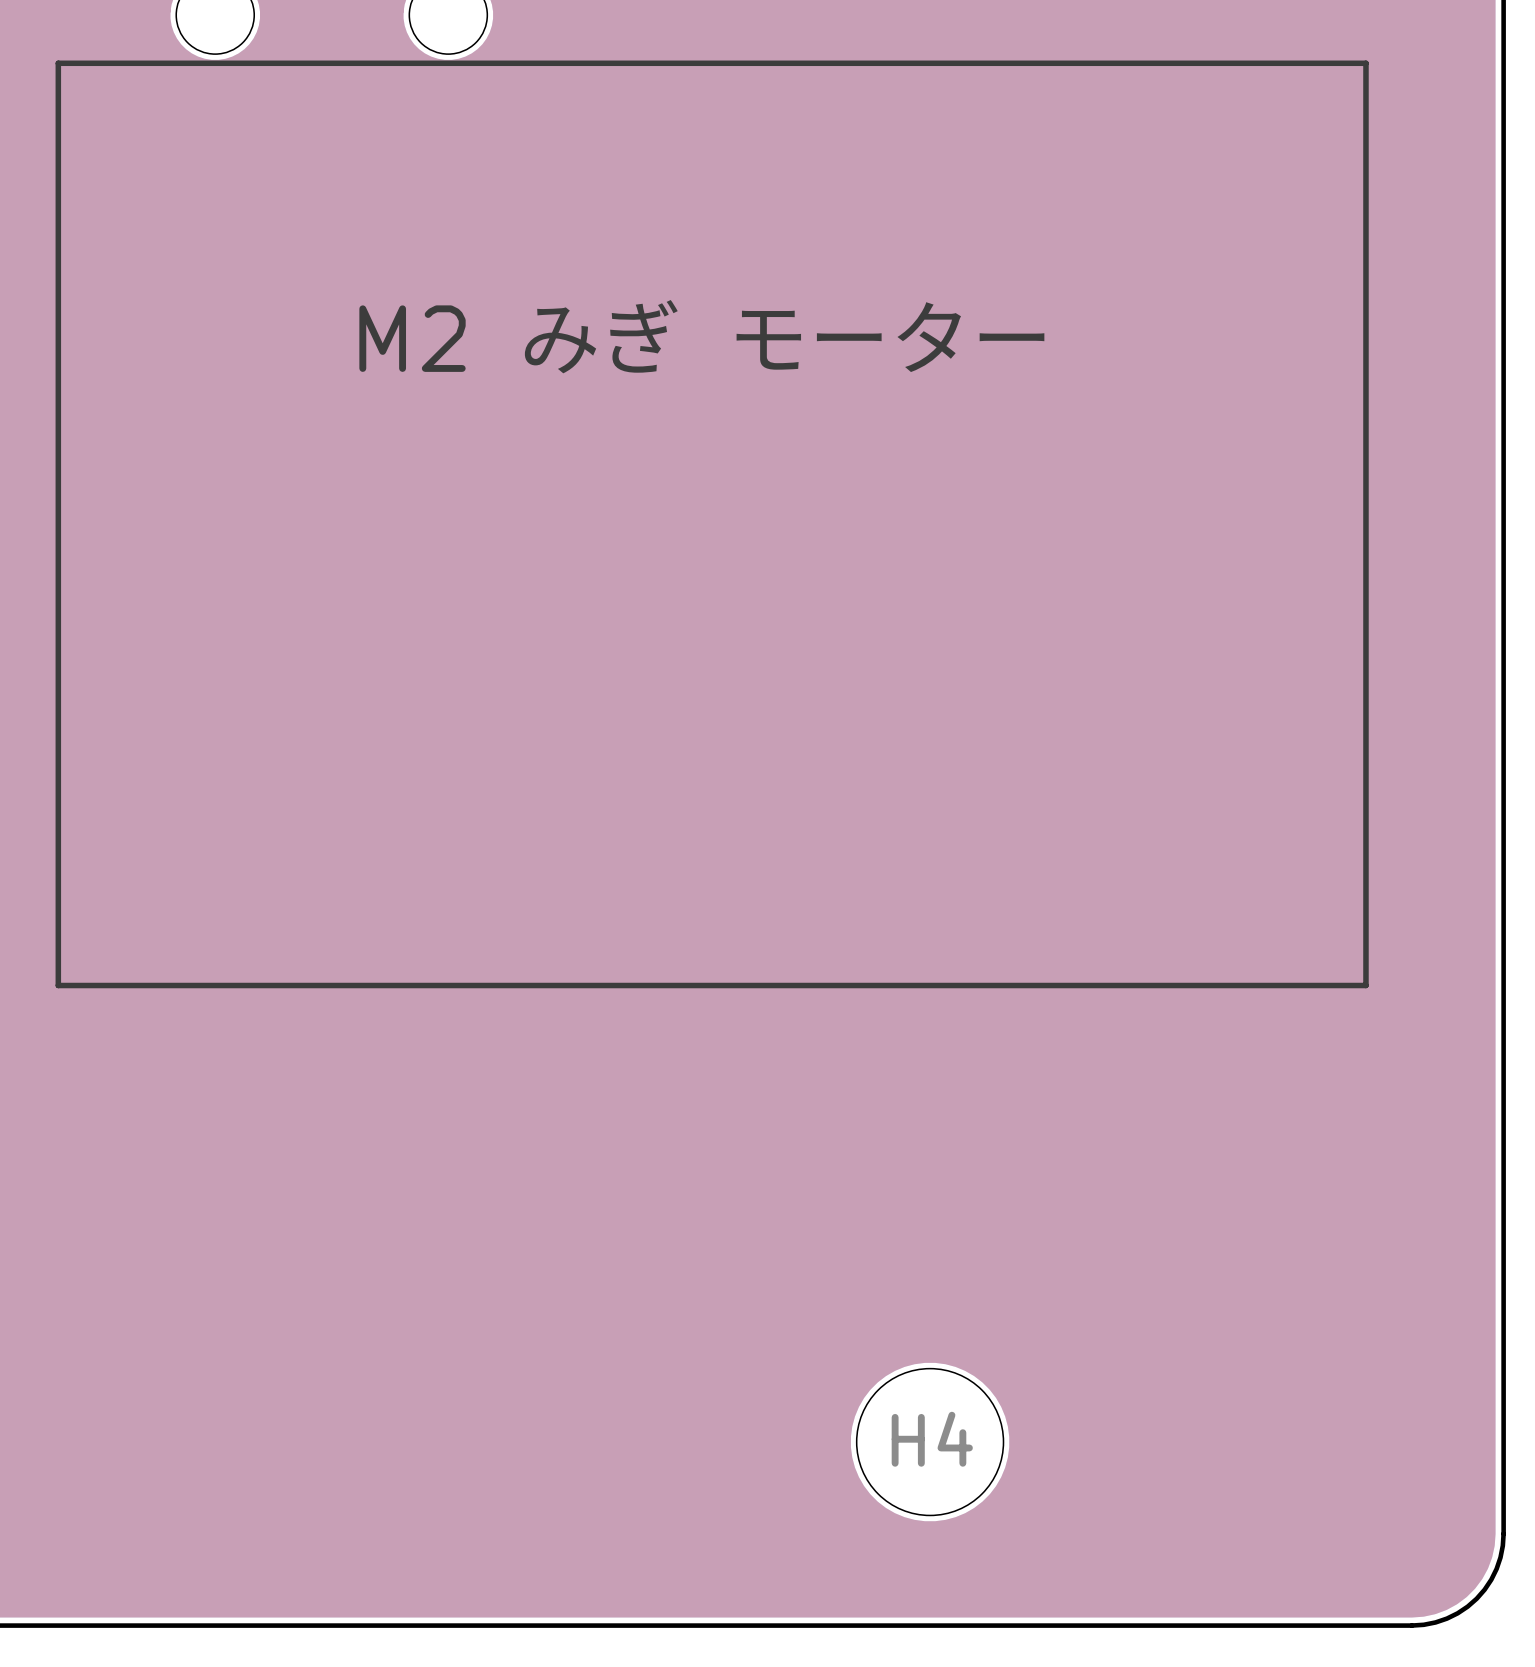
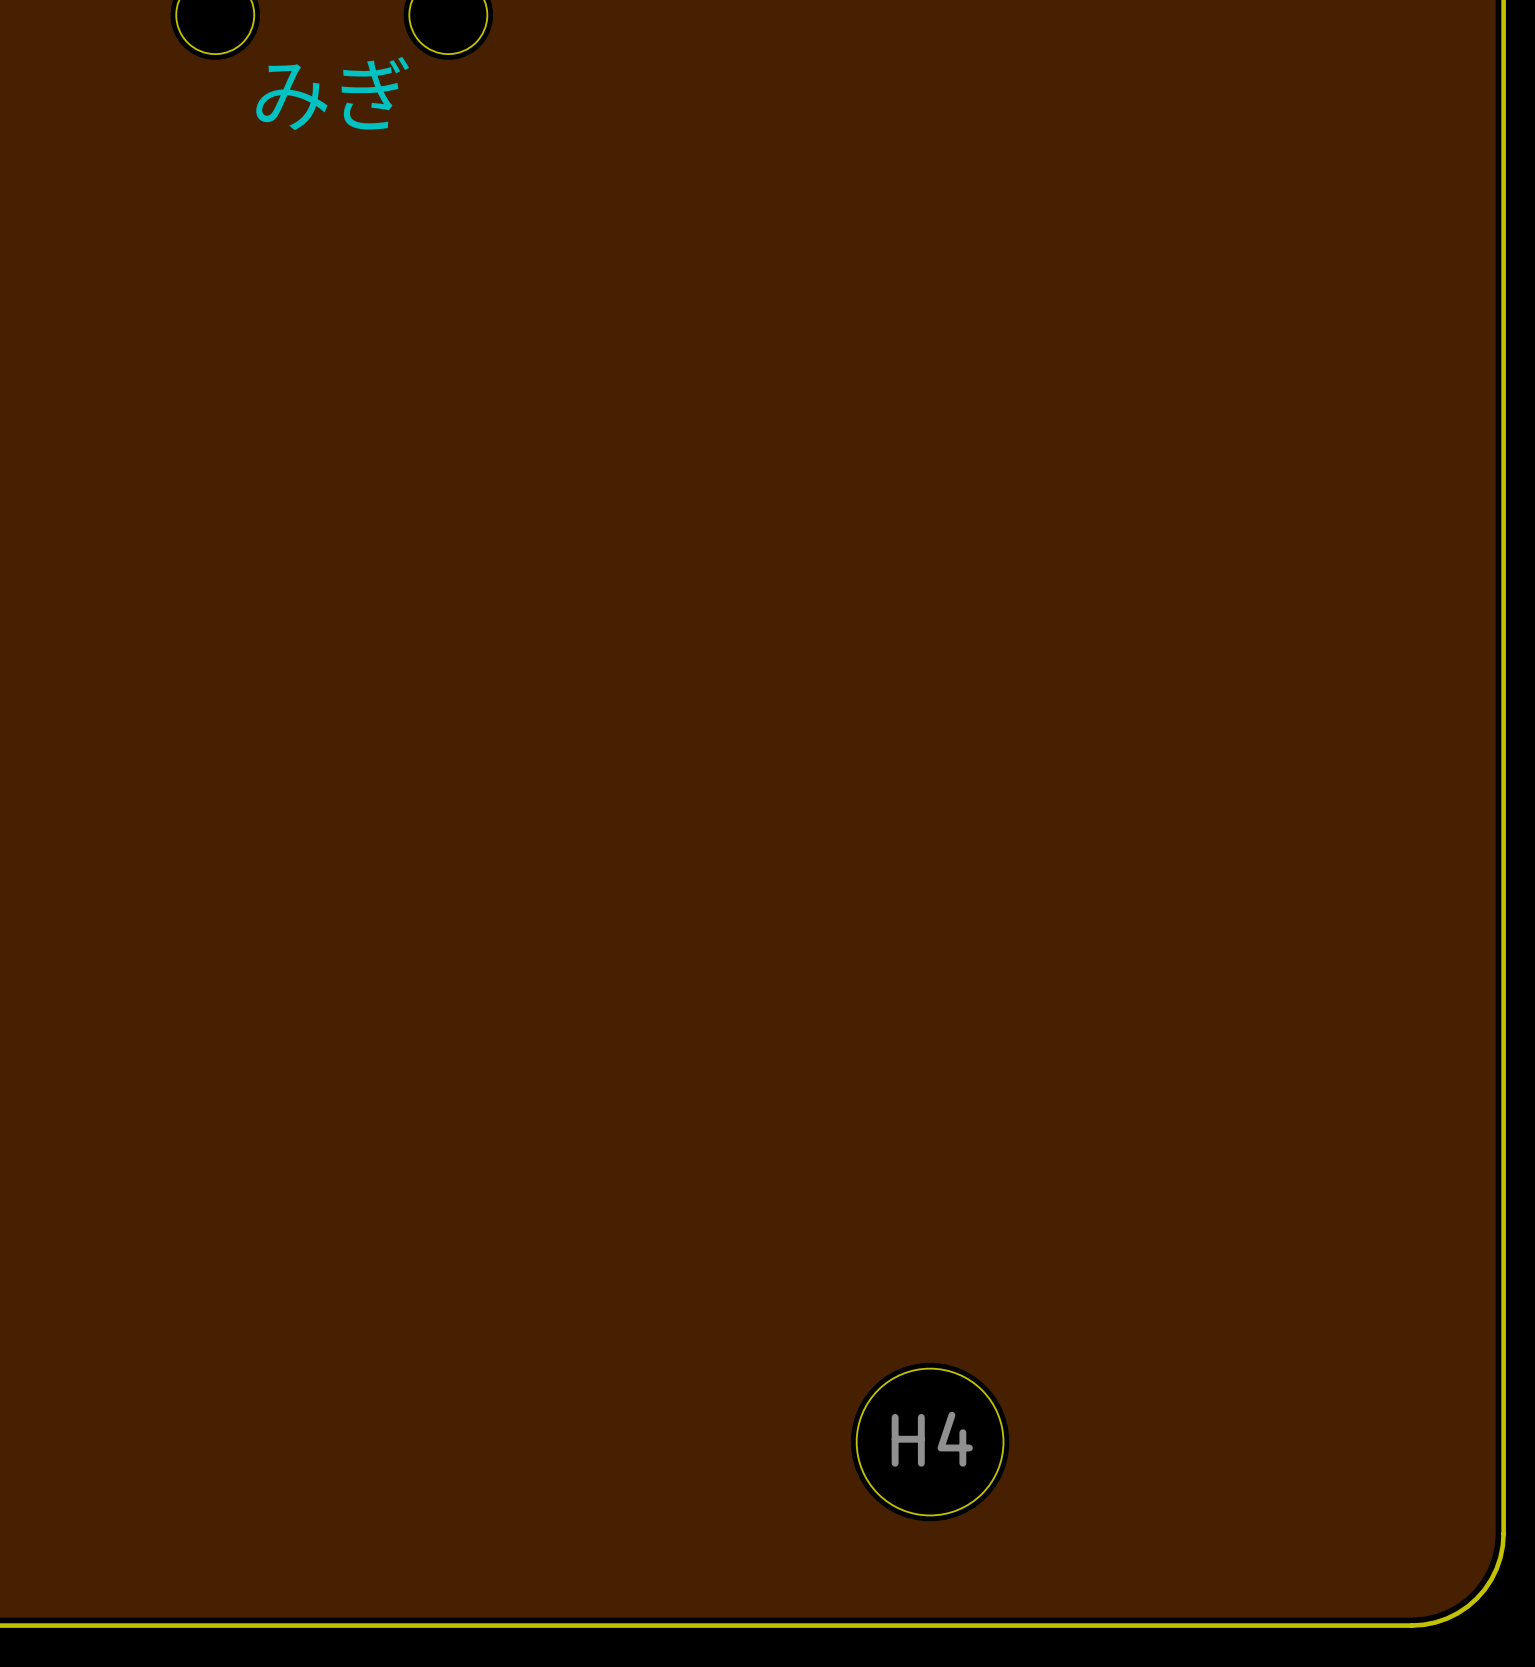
line: (58, 63) (1365, 63) (1365, 985) (58, 985) (58, 63) -> none
text: none -> みぎ (332, 93)
text: M2 みぎ モーター (703, 336) -> none

